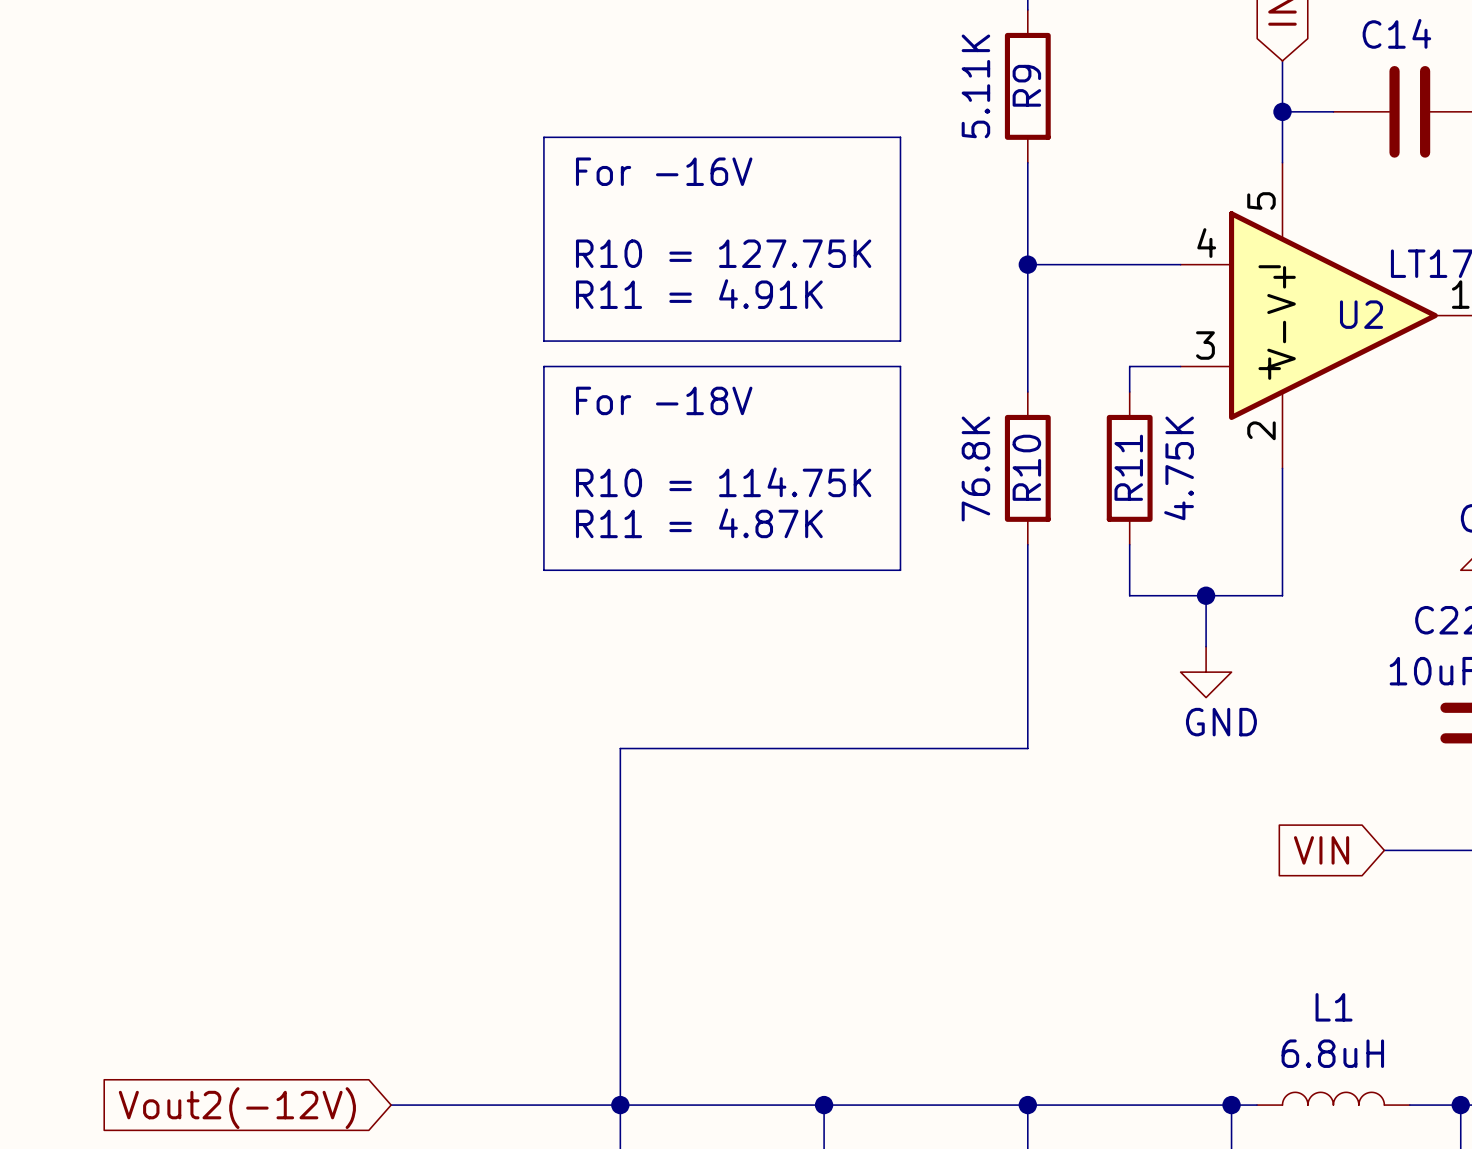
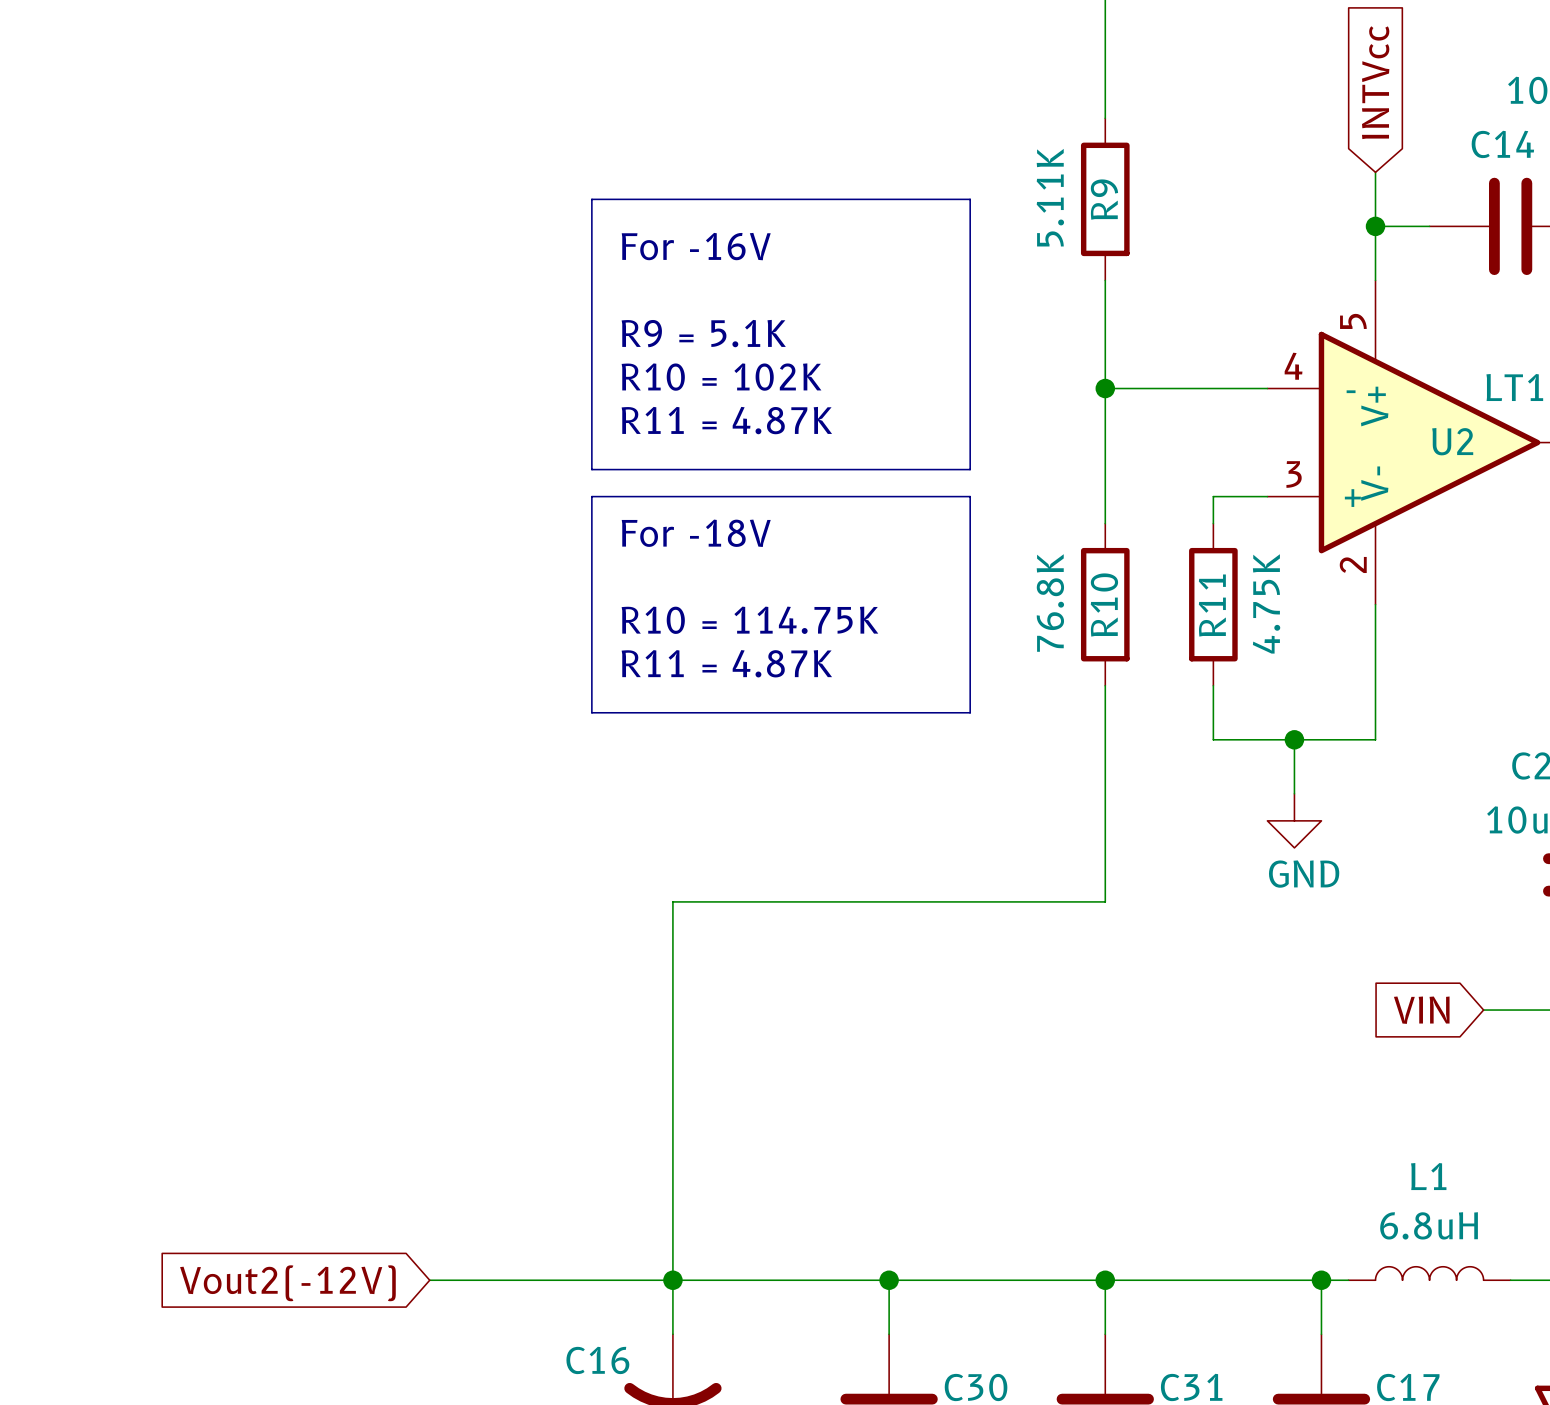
line: (543, 137) (900, 137) -> (591, 253) (591, 199) (970, 199) (970, 253)
text position: For -16V (664, 171) -> For -16V (696, 246)
text: none -> R9 = 5.1K (703, 333)
text: R10 = 127.75K (723, 253) -> R10 = 102K (721, 377)
text: R11 = 4.91K (699, 294) -> R11 = 4.87K (726, 420)

